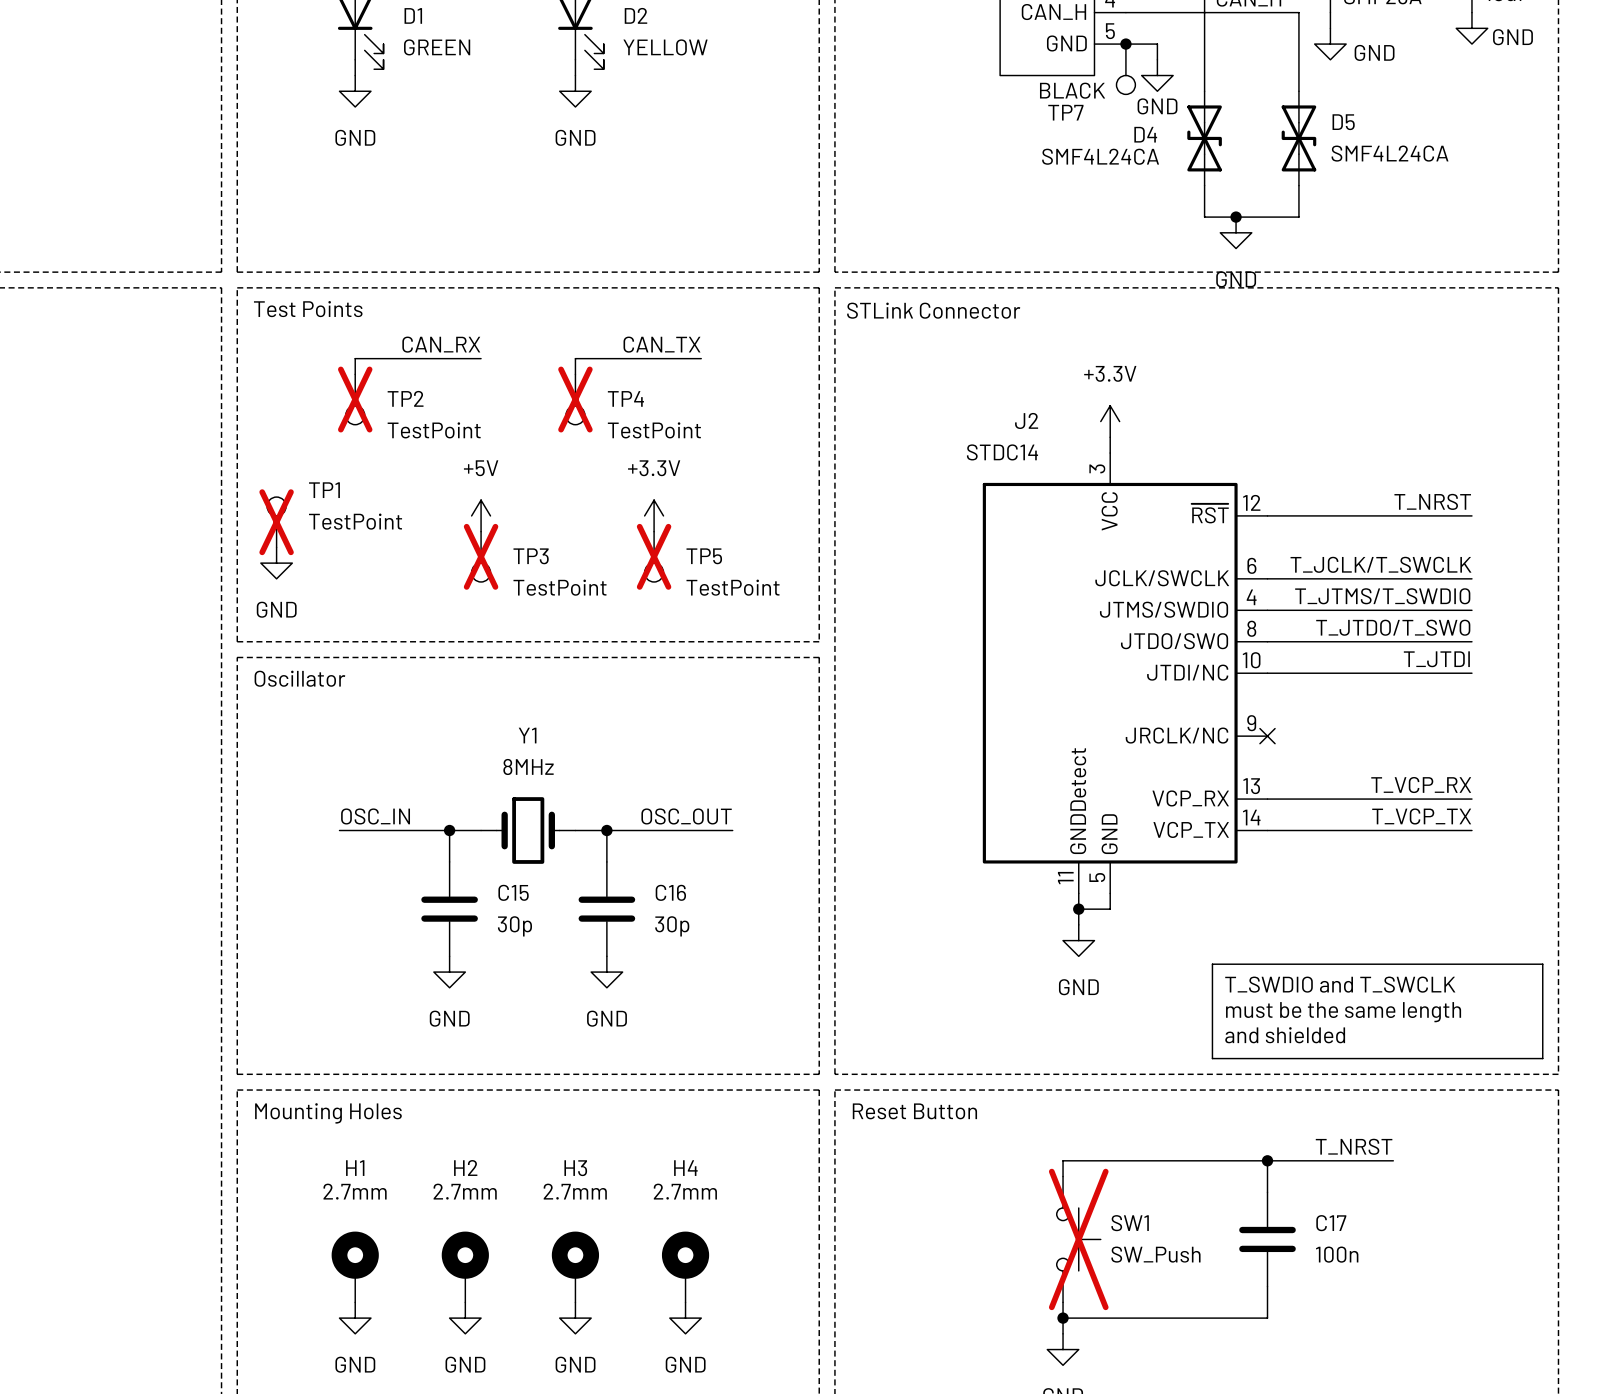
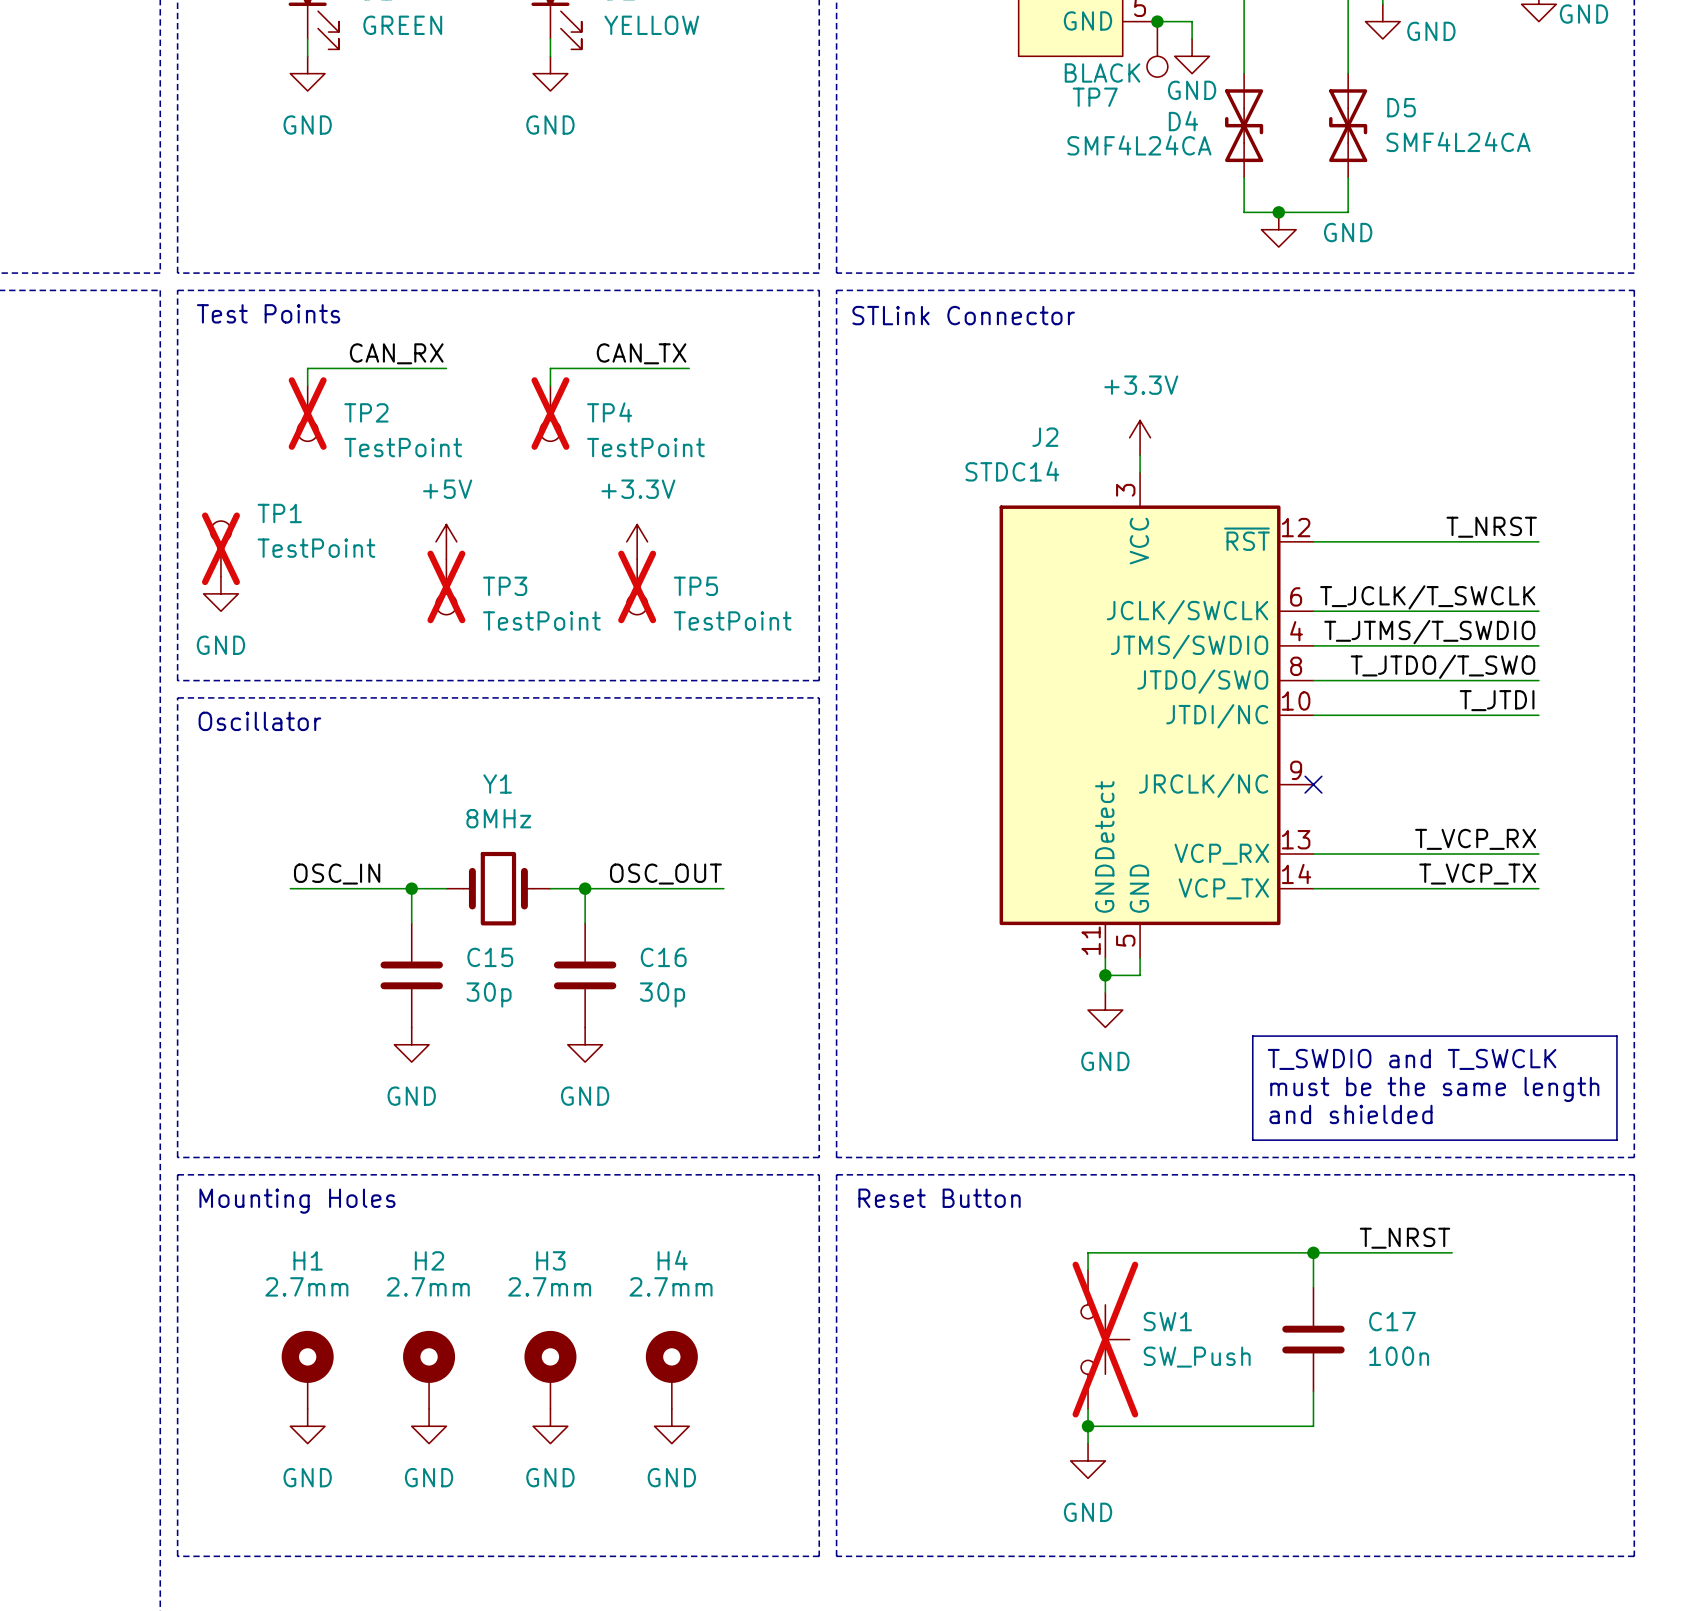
power symbol text position: GND (1236, 279) -> GND (1348, 232)

